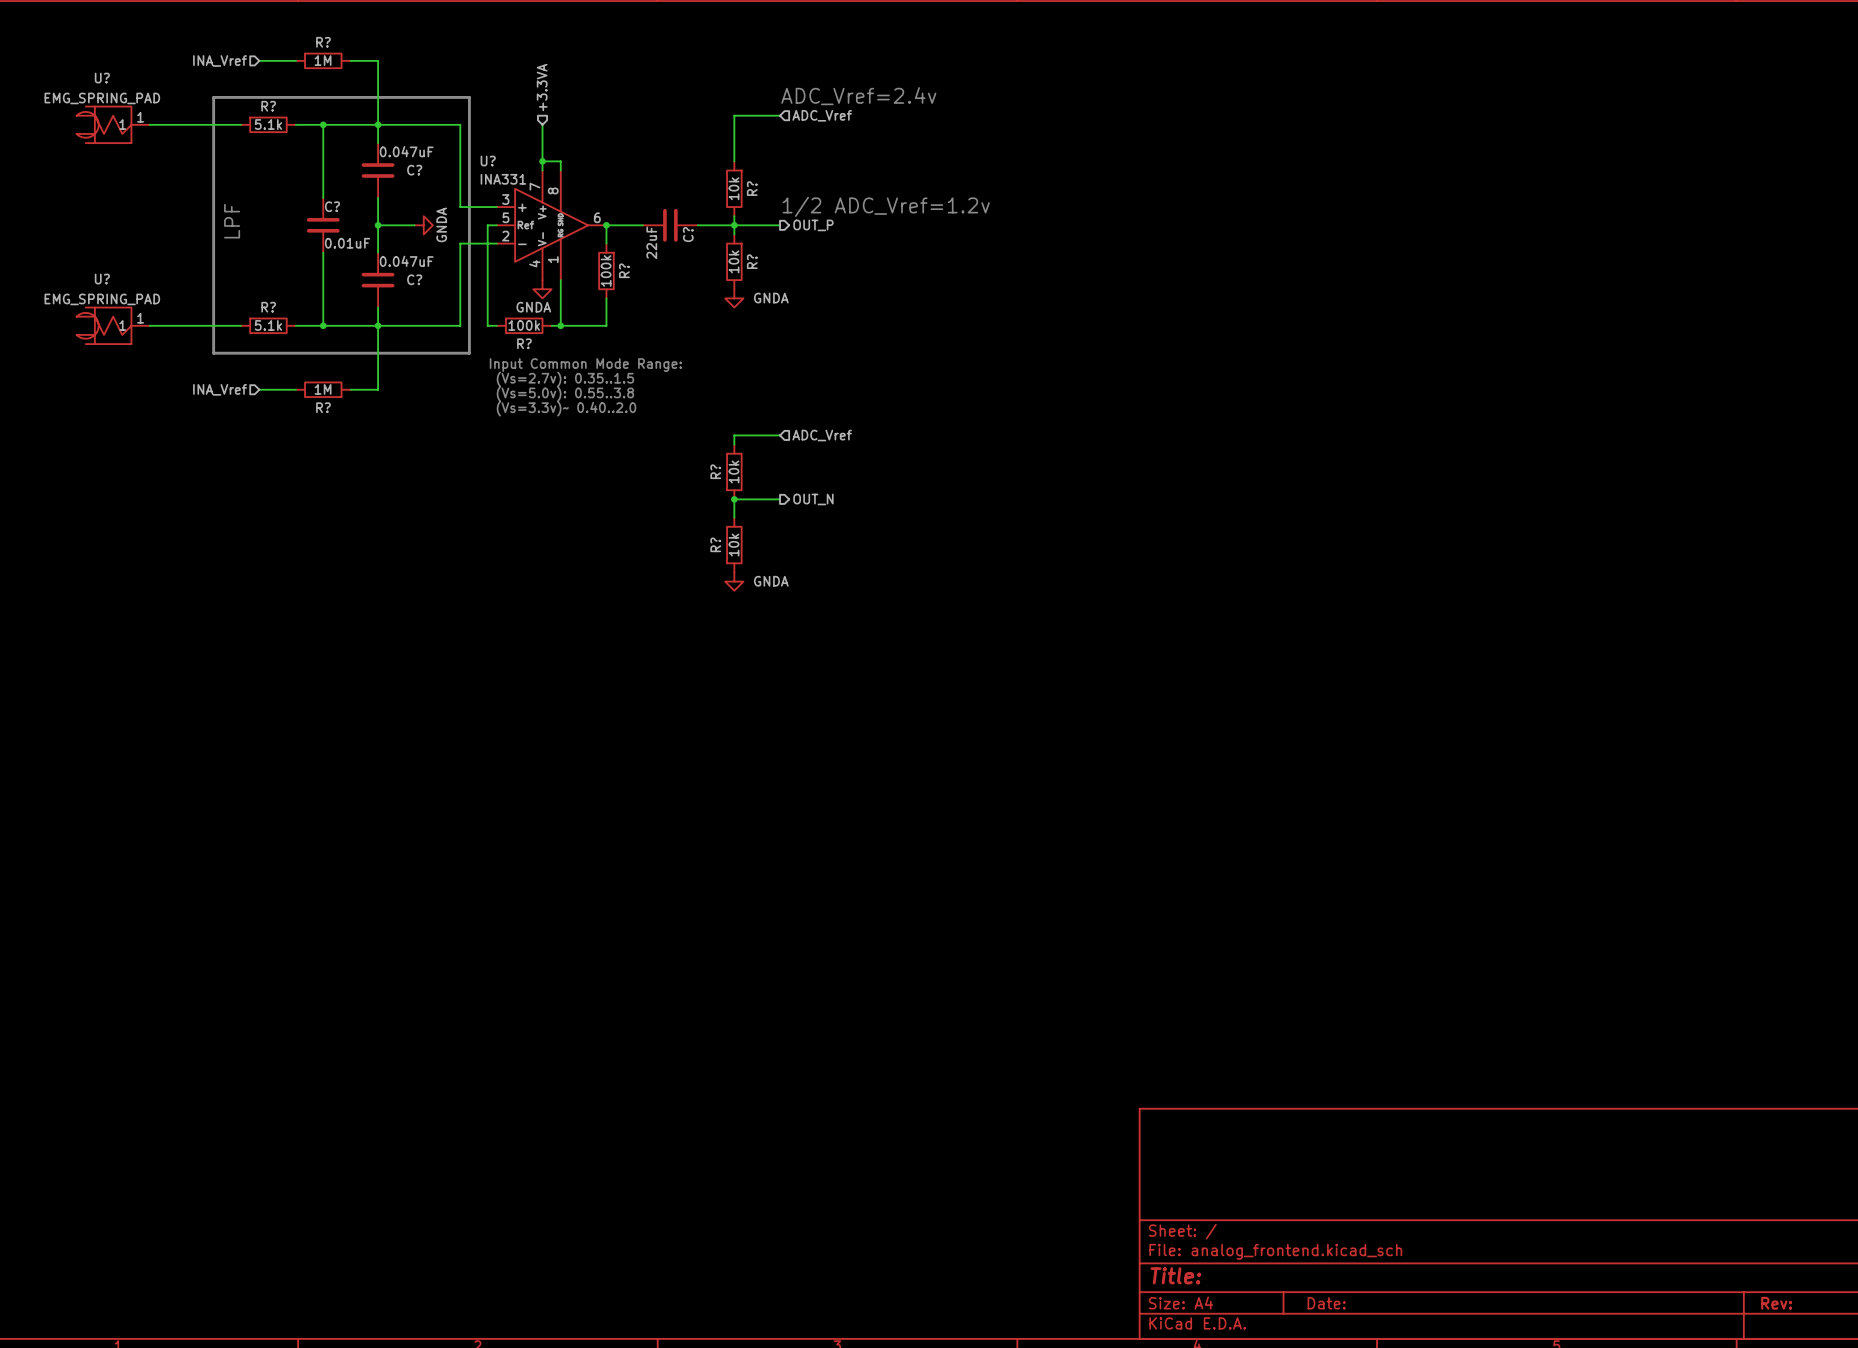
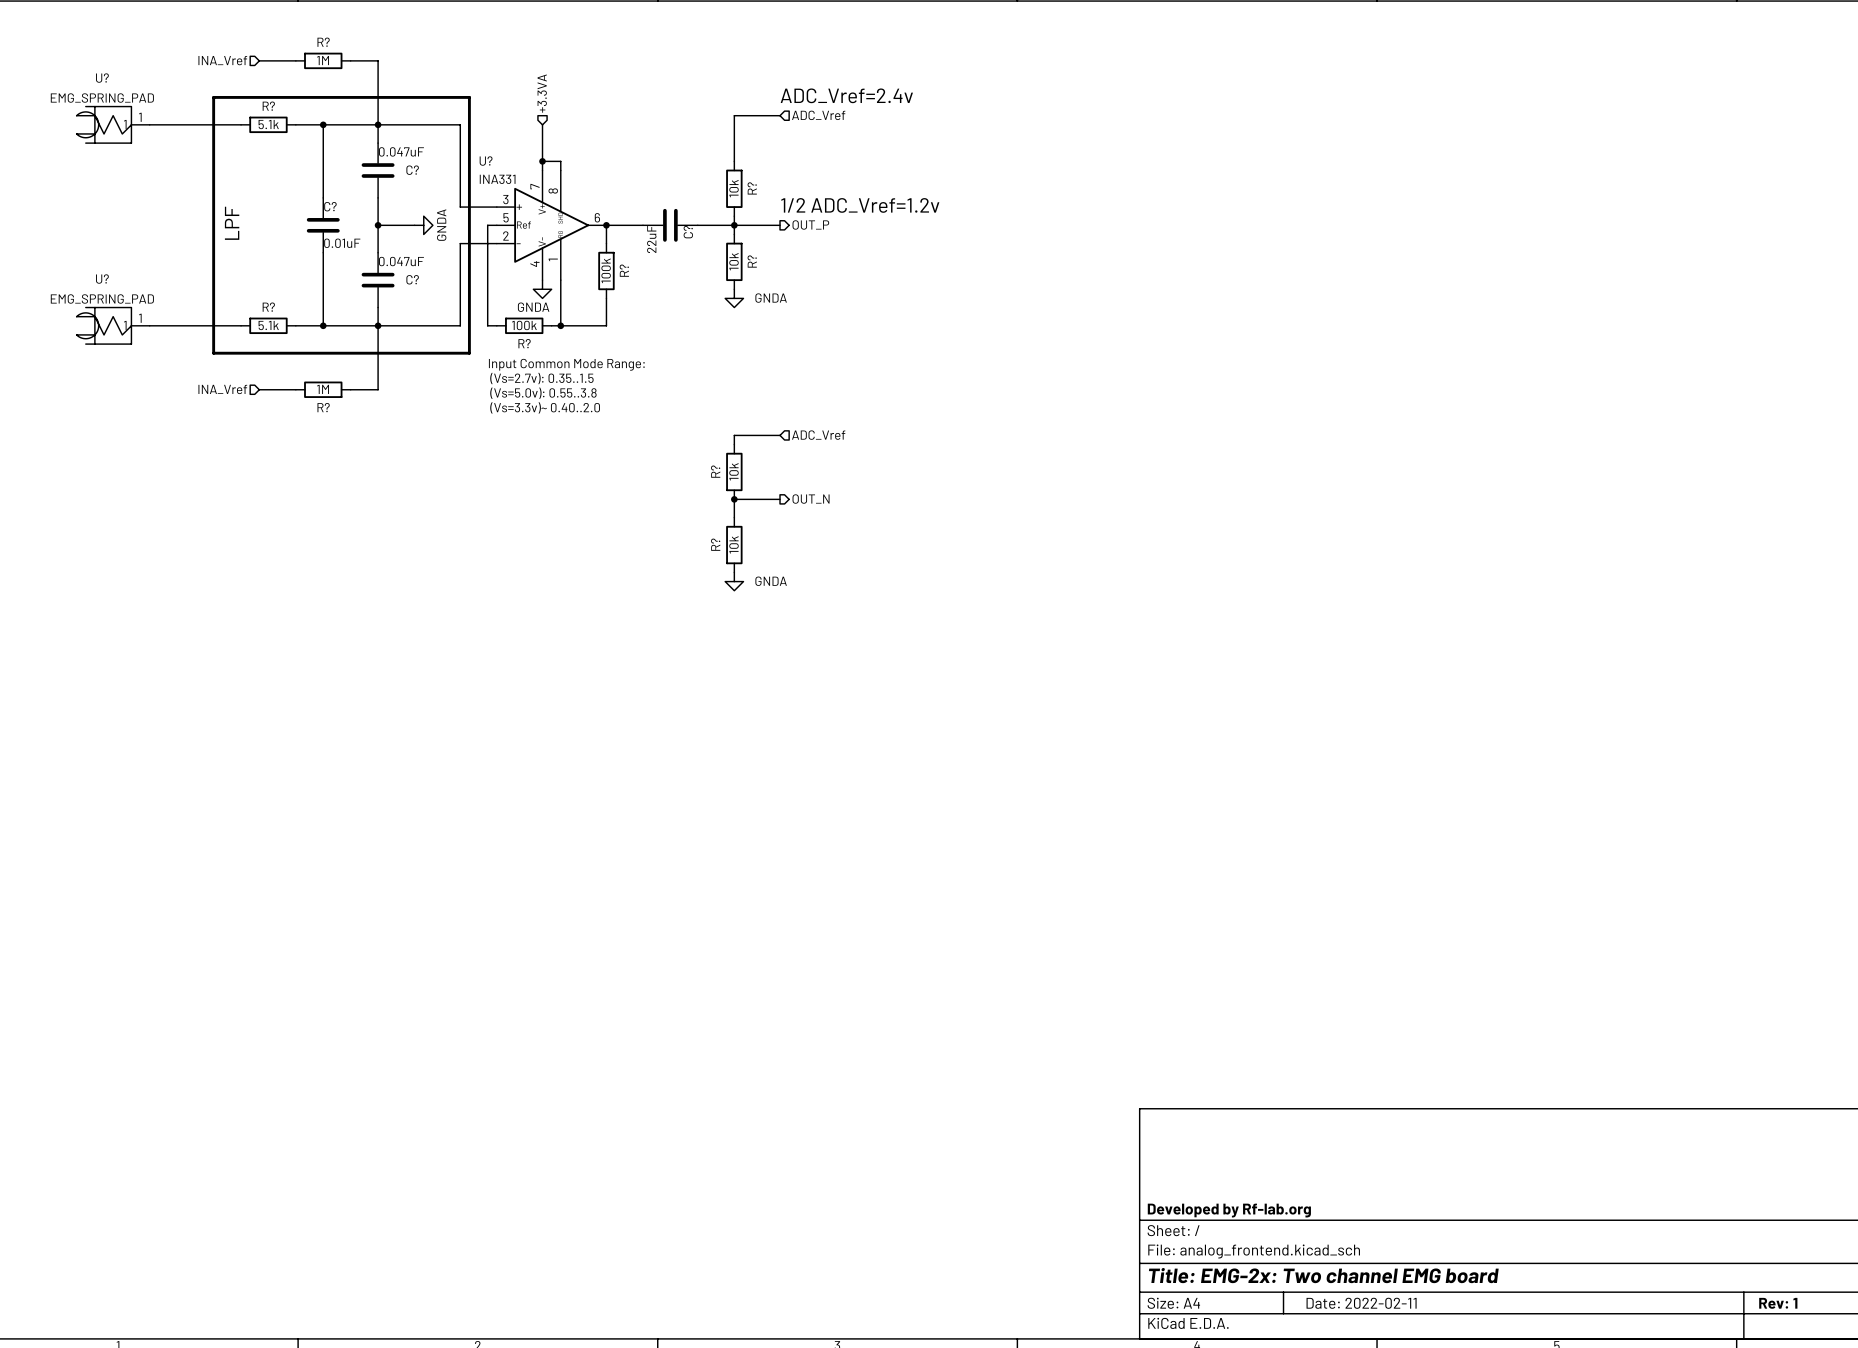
title block: none -> Developed by Rf-lab.org (1229, 1210)
title block: Title: (1175, 1275) -> Title: EMG-2x: Two channel EMG board (1323, 1275)
title block: Date: (1326, 1303) -> Date: 2022-02-11 (1361, 1303)
title block: Rev: (1776, 1303) -> Rev: 1 (1778, 1303)

